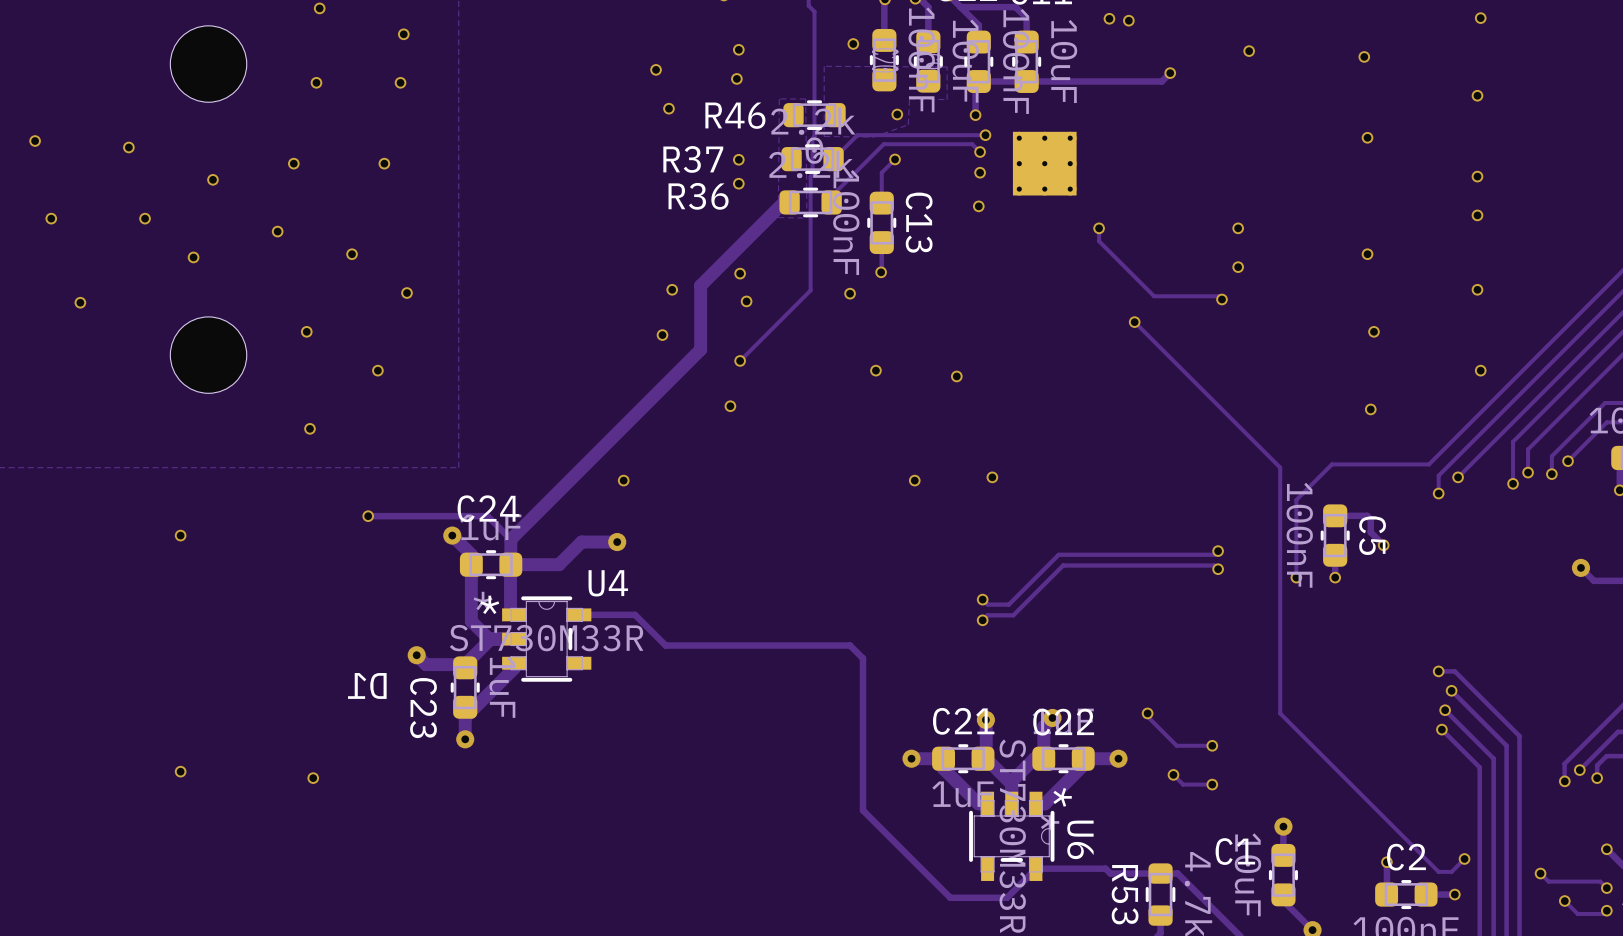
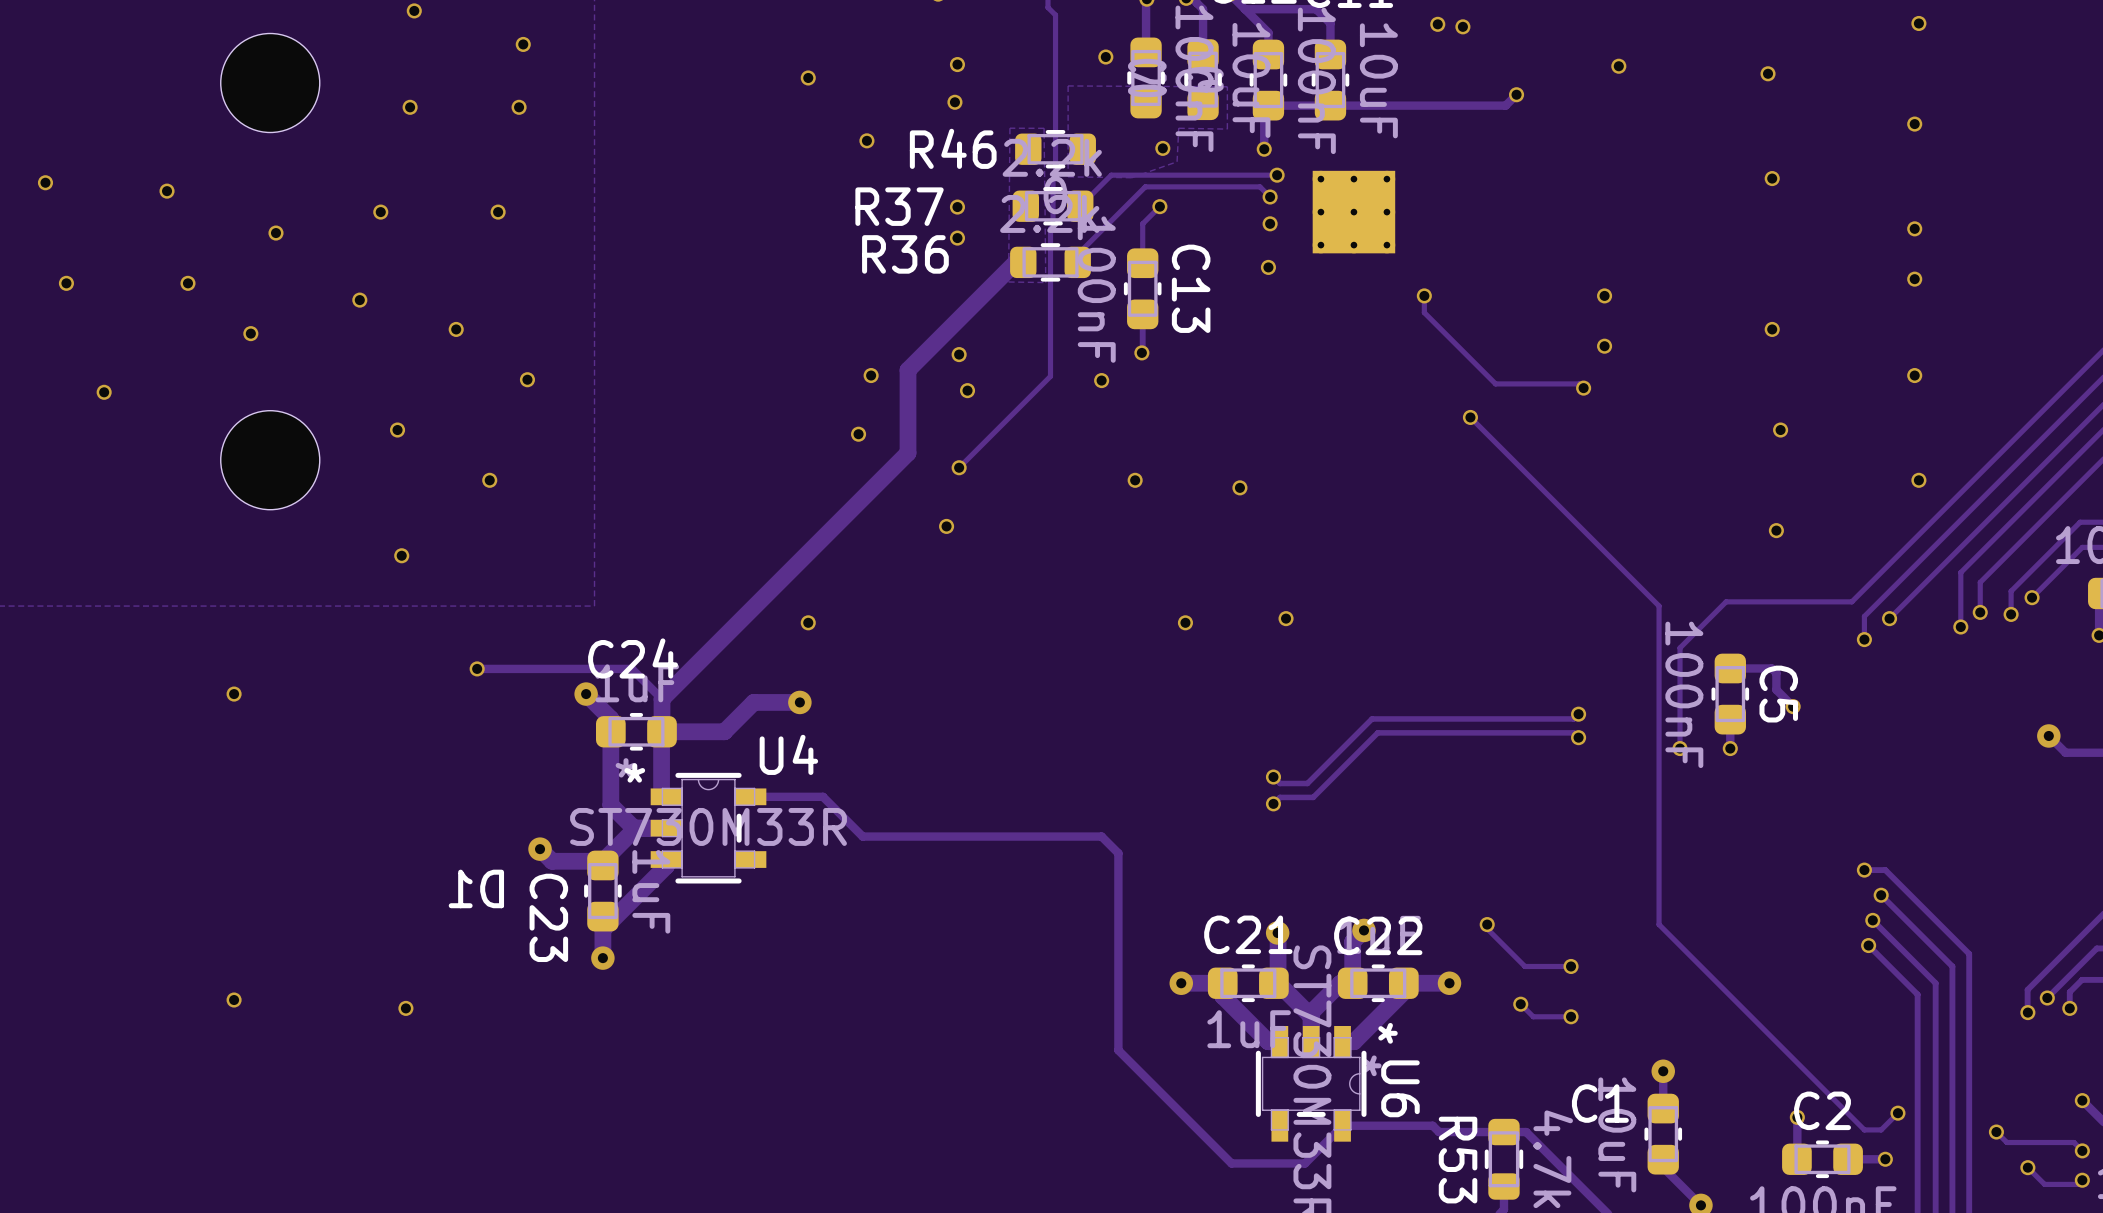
via position: (656, 69) -> (808, 77)

